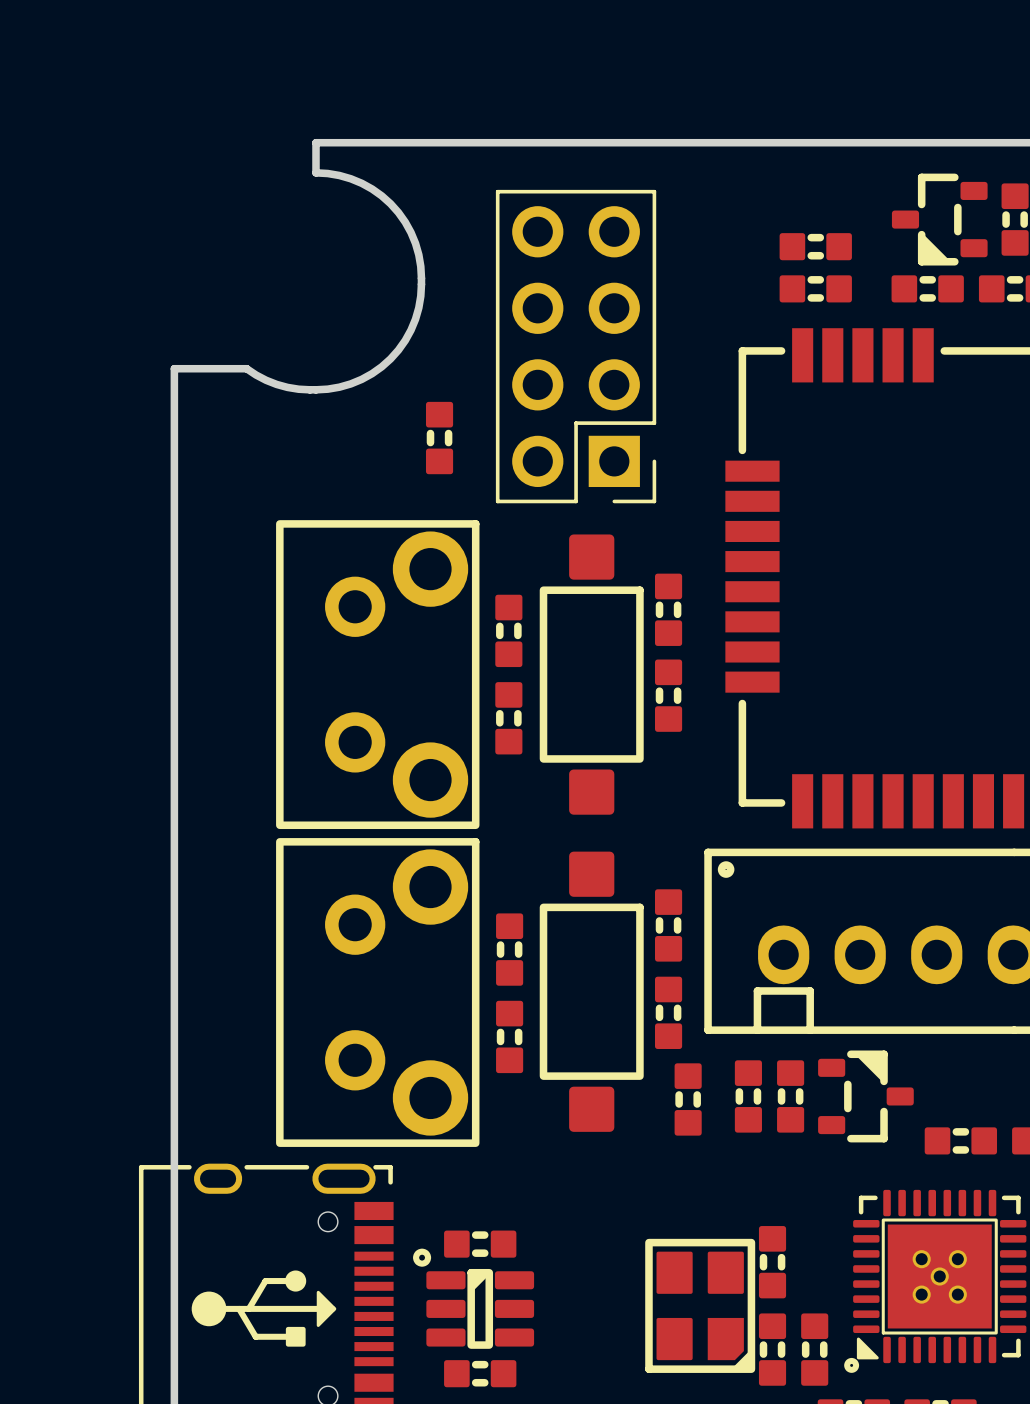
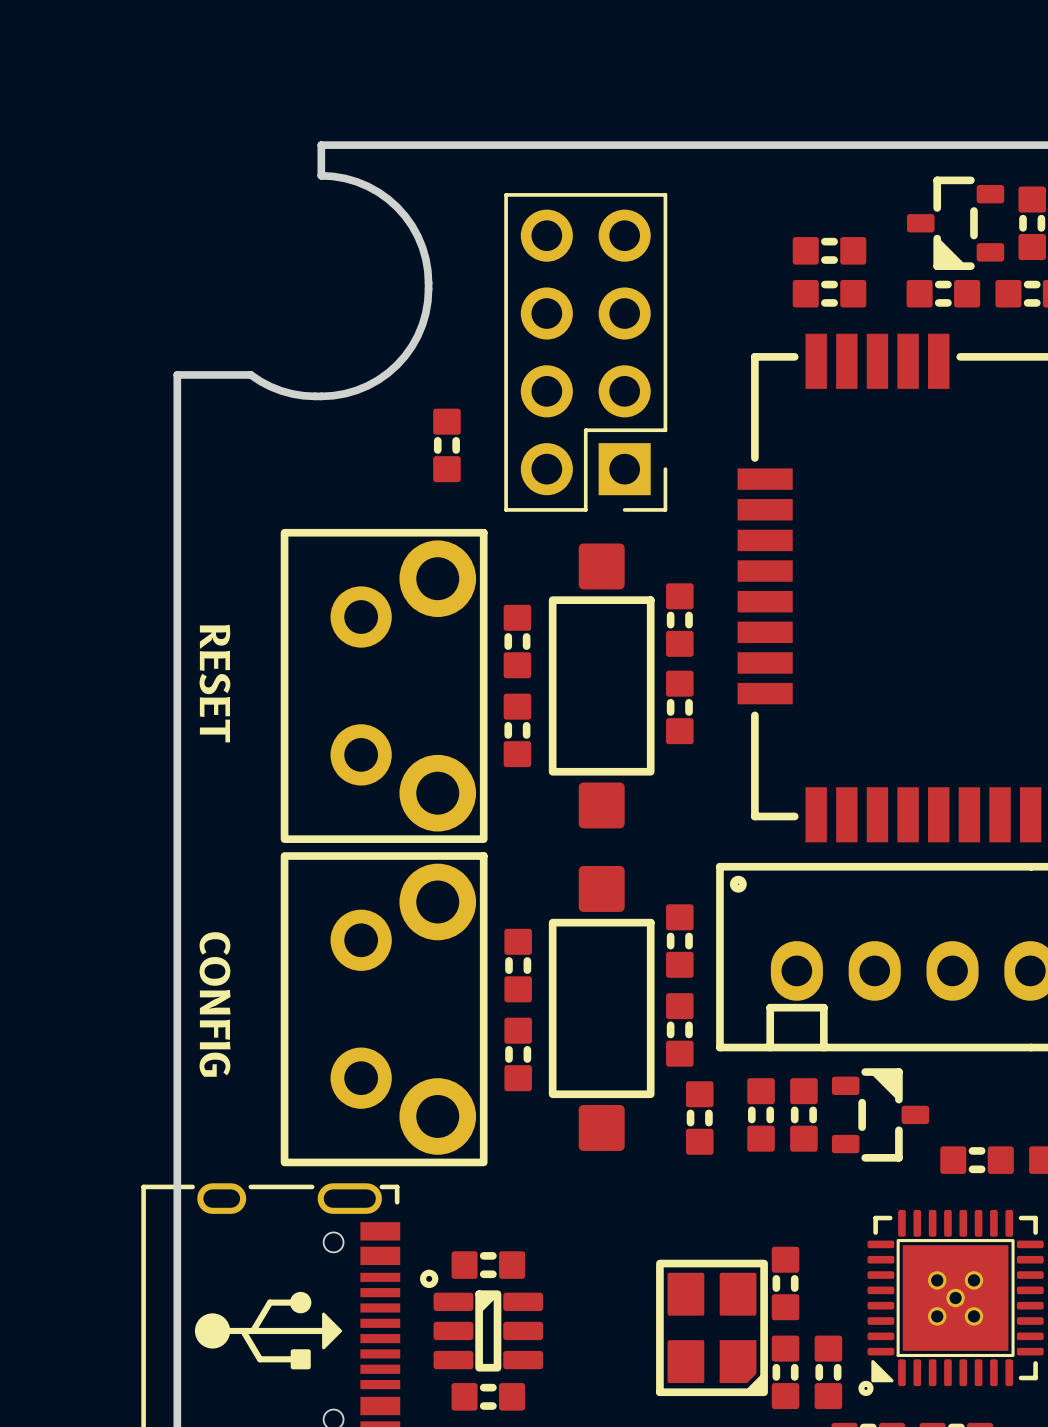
text: none -> RESET (214, 683)
text: none -> CONFIG (215, 1004)

